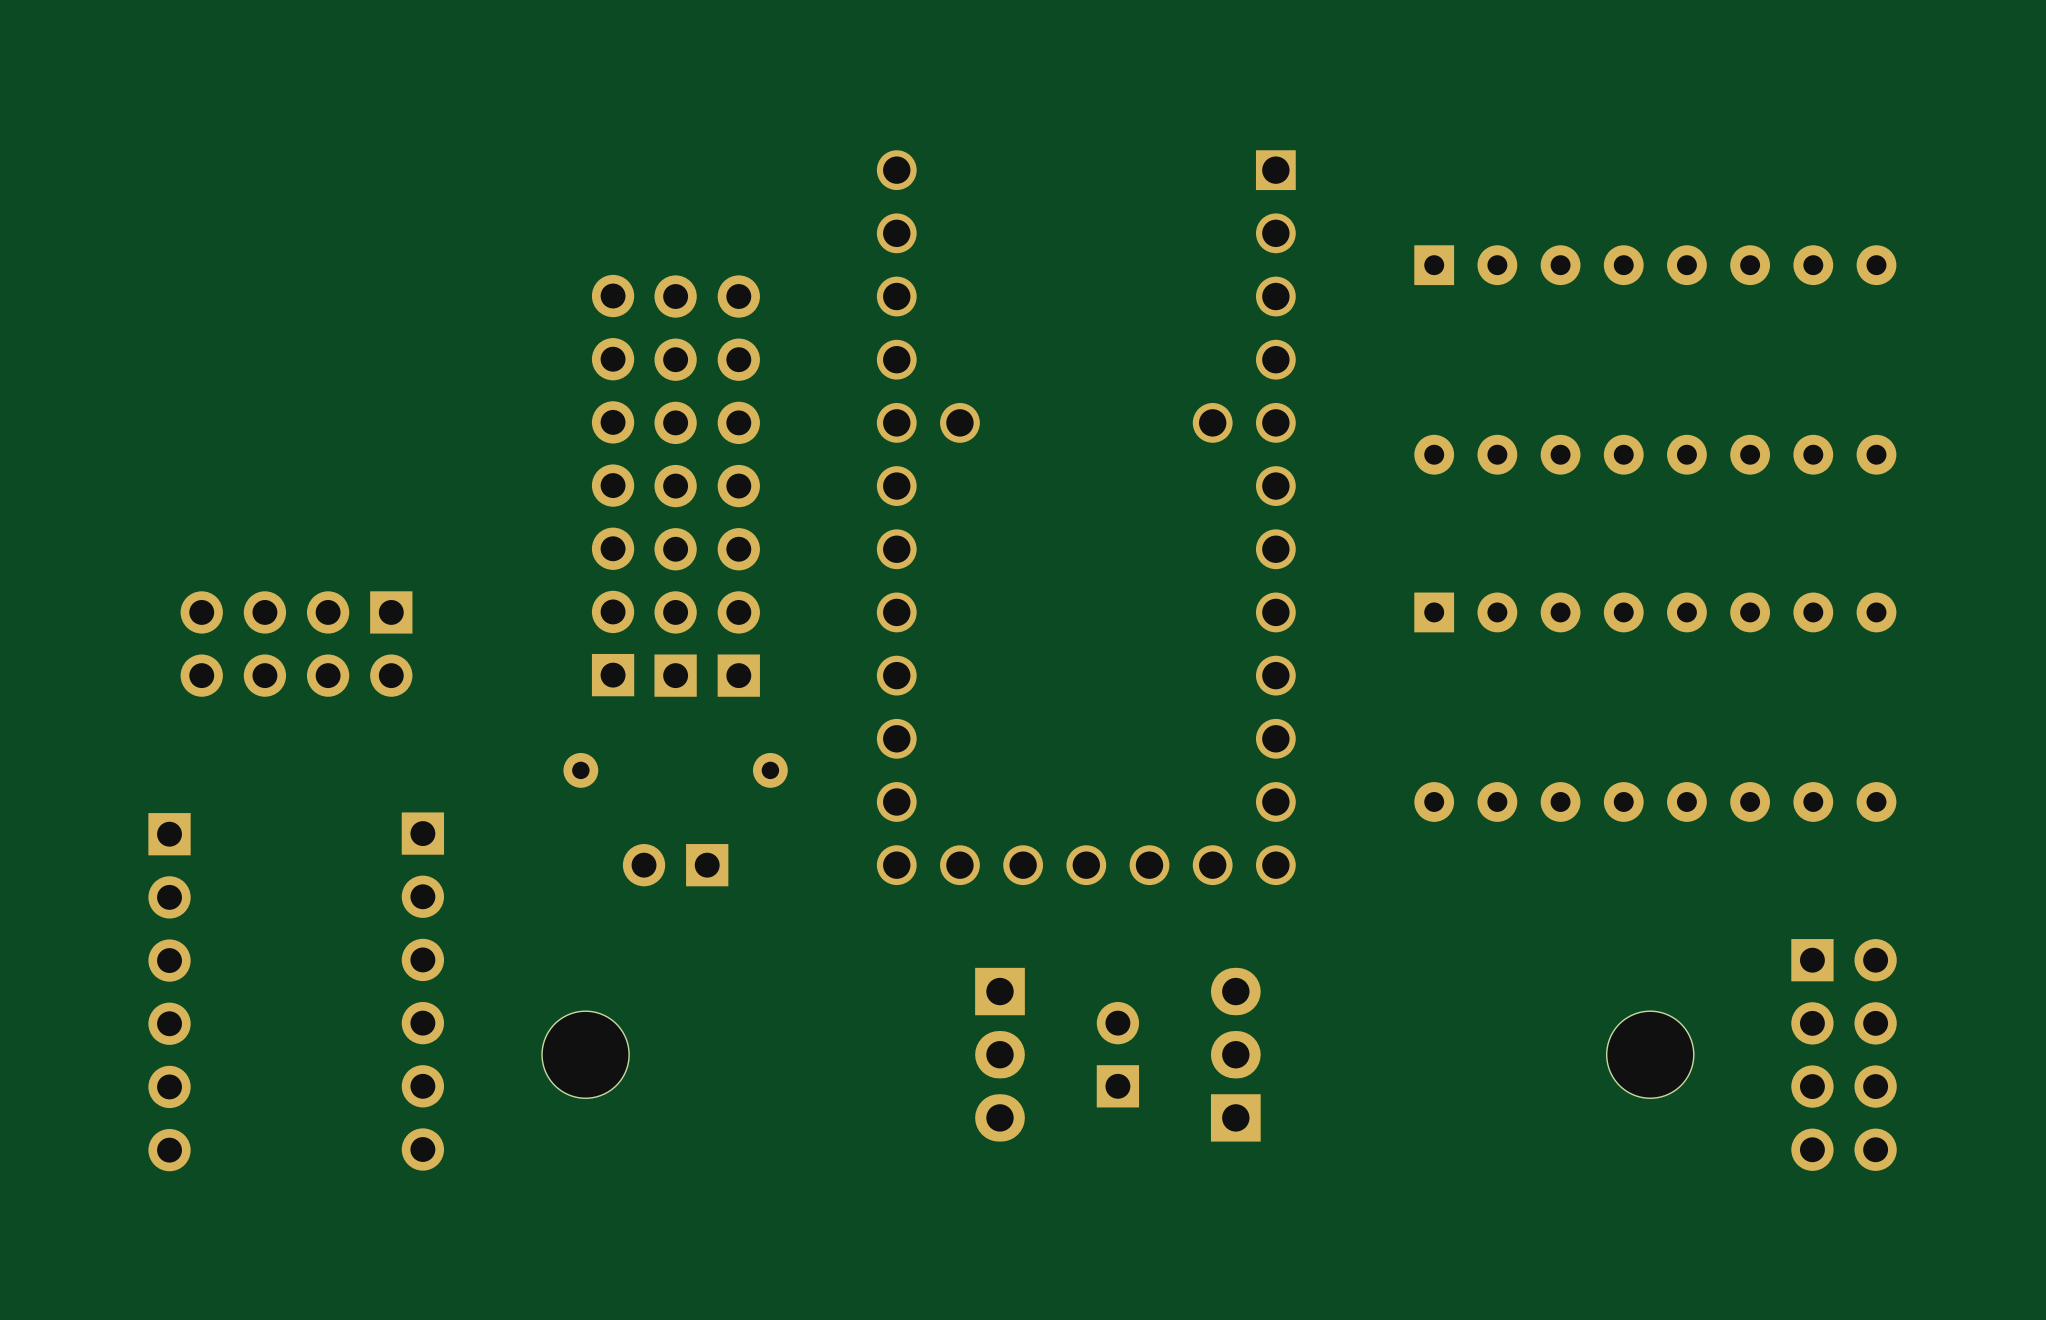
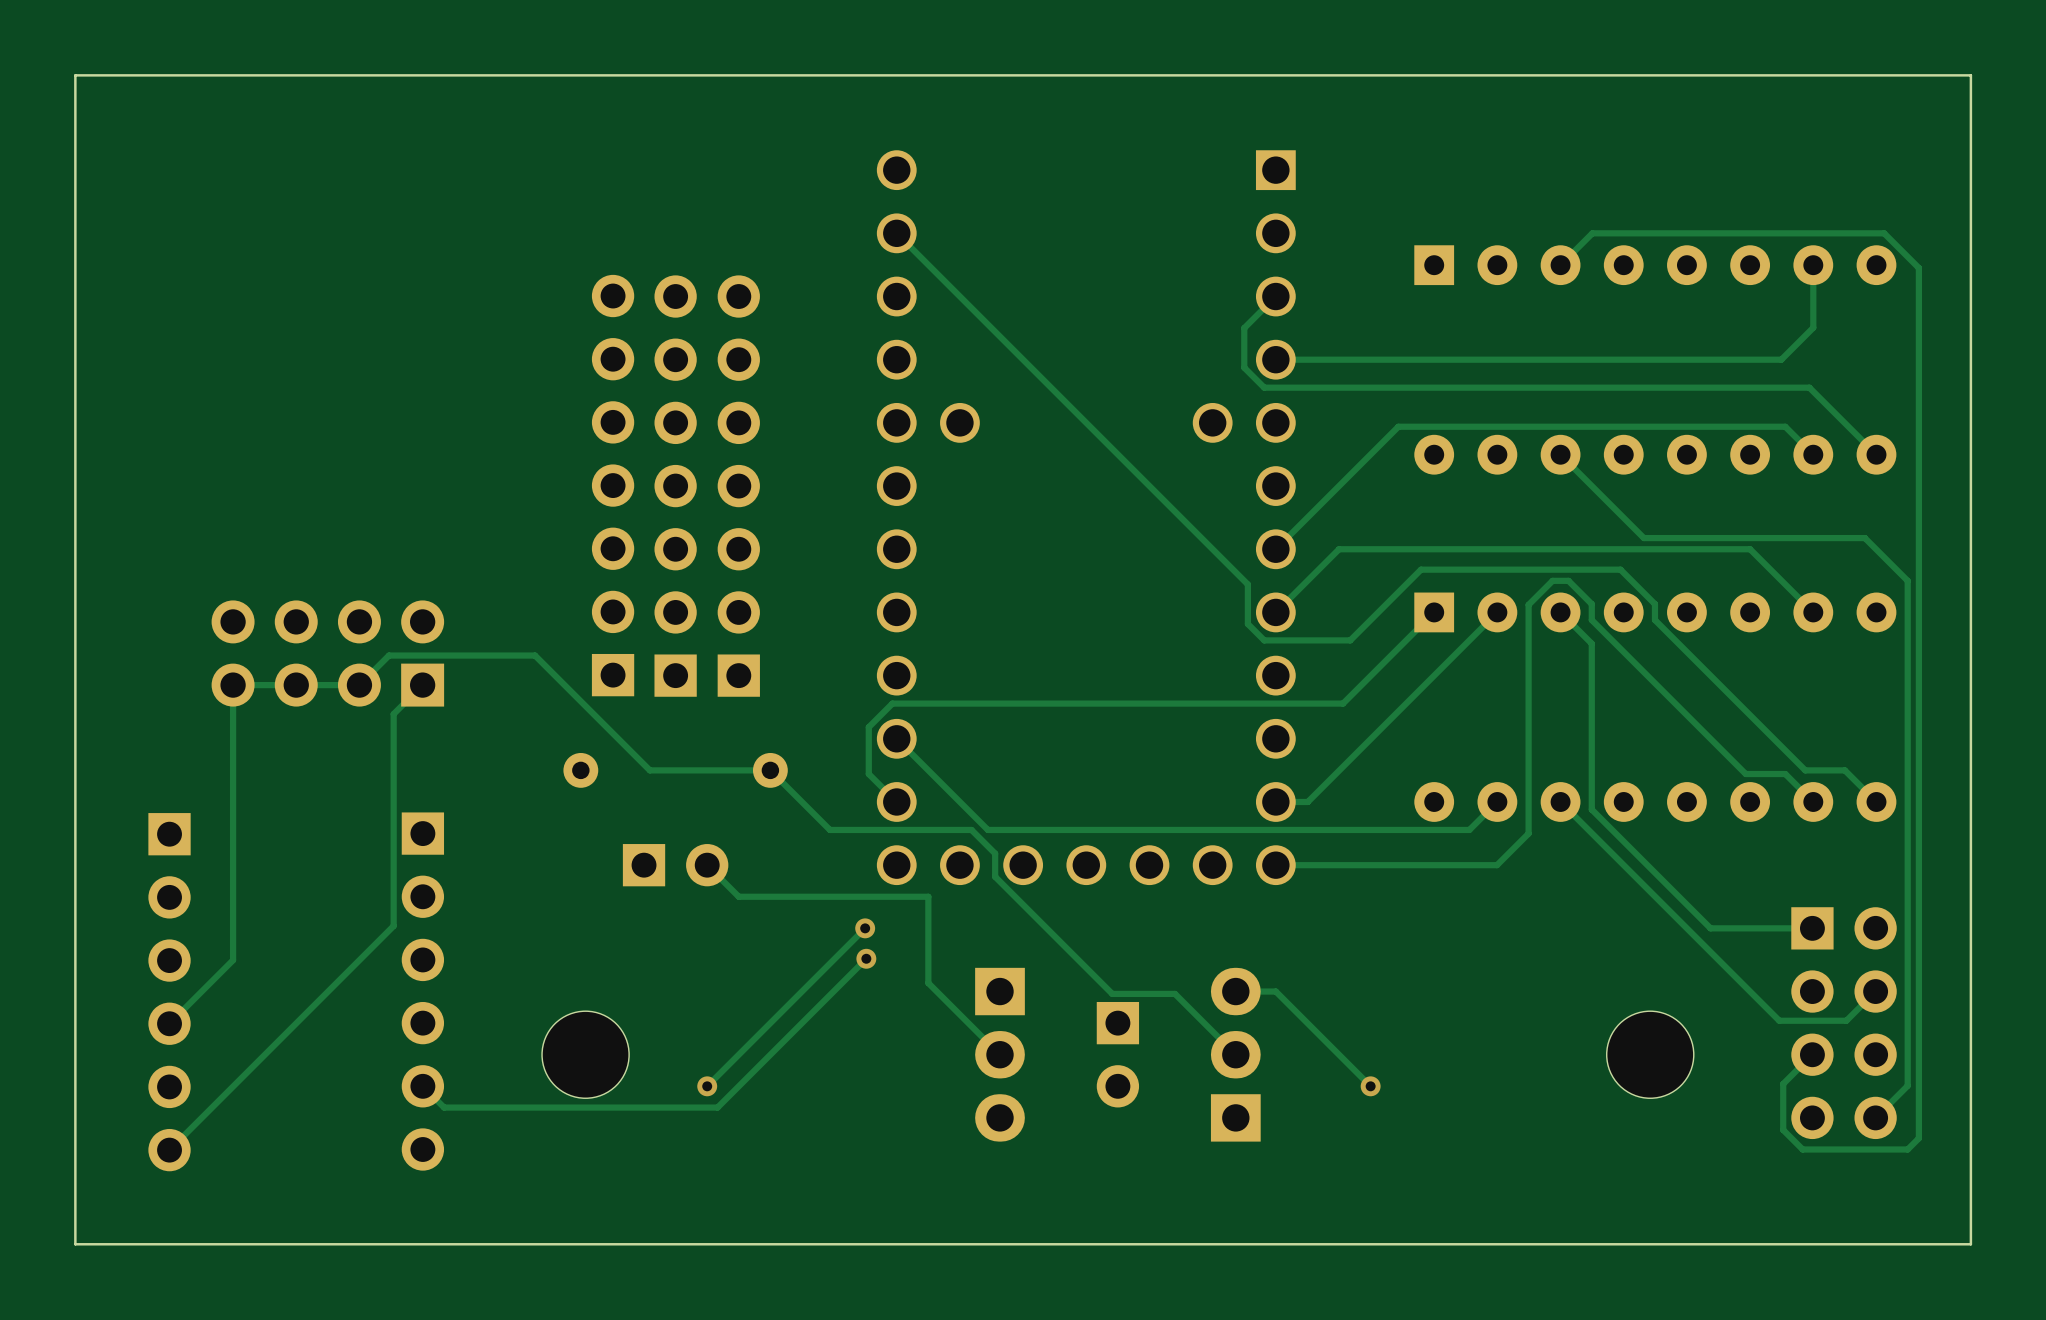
board edge: none -> (1970, 75) (75, 75) (75, 1244) (1970, 1244) (1970, 75)
track: none -> (896, 233) (1247, 584) (1247, 624) (1264, 640) (1350, 640) (1421, 569) (1620, 569) (1654, 604) (1654, 620) (1805, 770) (1844, 770) (1876, 801)
track: none -> (1560, 265) (1592, 233) (1884, 233) (1918, 268) (1918, 1138) (1907, 1149) (1802, 1149) (1783, 1130) (1783, 1083) (1812, 1054)
track: none -> (1813, 265) (1813, 327) (1781, 359) (1275, 359)
track: none -> (1275, 296) (1244, 328) (1244, 367) (1264, 387) (1809, 387) (1876, 454)
track: none -> (1560, 454) (1643, 538) (1864, 538) (1907, 580) (1907, 1085) (1875, 1117)
track: none -> (1813, 454) (1785, 426) (1398, 426) (1275, 549)
track: none -> (1434, 612) (1343, 703) (892, 703) (868, 727) (868, 774) (896, 801)
track: none -> (1497, 612) (1307, 801) (1275, 801)
track: none -> (1560, 612) (1591, 643) (1591, 809) (1710, 928) (1812, 928)
track: none -> (1813, 612) (1750, 549) (1339, 549) (1275, 612)
part: (296, 644) -> none
part: none -> (327, 653)
track: none -> (422, 685) (393, 714) (393, 925) (169, 1150)
track: none -> (896, 738) (987, 829) (1469, 829) (1497, 801)
track: none -> (1560, 801) (1779, 1020) (1846, 1020) (1875, 991)
track: none -> (1813, 801) (1785, 774) (1745, 774) (1591, 620) (1591, 604) (1568, 580) (1552, 580) (1528, 604) (1528, 833) (1497, 865) (1275, 865)
part rotation: 0° (675, 865) -> 180° (675, 865)
track: none -> (707, 865) (738, 896) (928, 896) (928, 983) (999, 1054)
track: none -> (865, 928) (707, 1086)
via: none -> (865, 928)
track: none -> (866, 958) (717, 1107) (444, 1107) (422, 1086)
via: none -> (866, 958)
track: none -> (1235, 991) (1275, 991) (1370, 1086)
track: none -> (169, 1023) (233, 960) (233, 685) (359, 685) (389, 655) (535, 655) (649, 770) (770, 770) (829, 829) (971, 829) (995, 853) (995, 876) (1112, 993) (1175, 993) (1235, 1054)
part rotation: 0° (1117, 1054) -> 180° (1117, 1054)
part position: (1844, 1054) -> (1844, 1023)
via: none -> (707, 1086)
via: none -> (1370, 1086)

